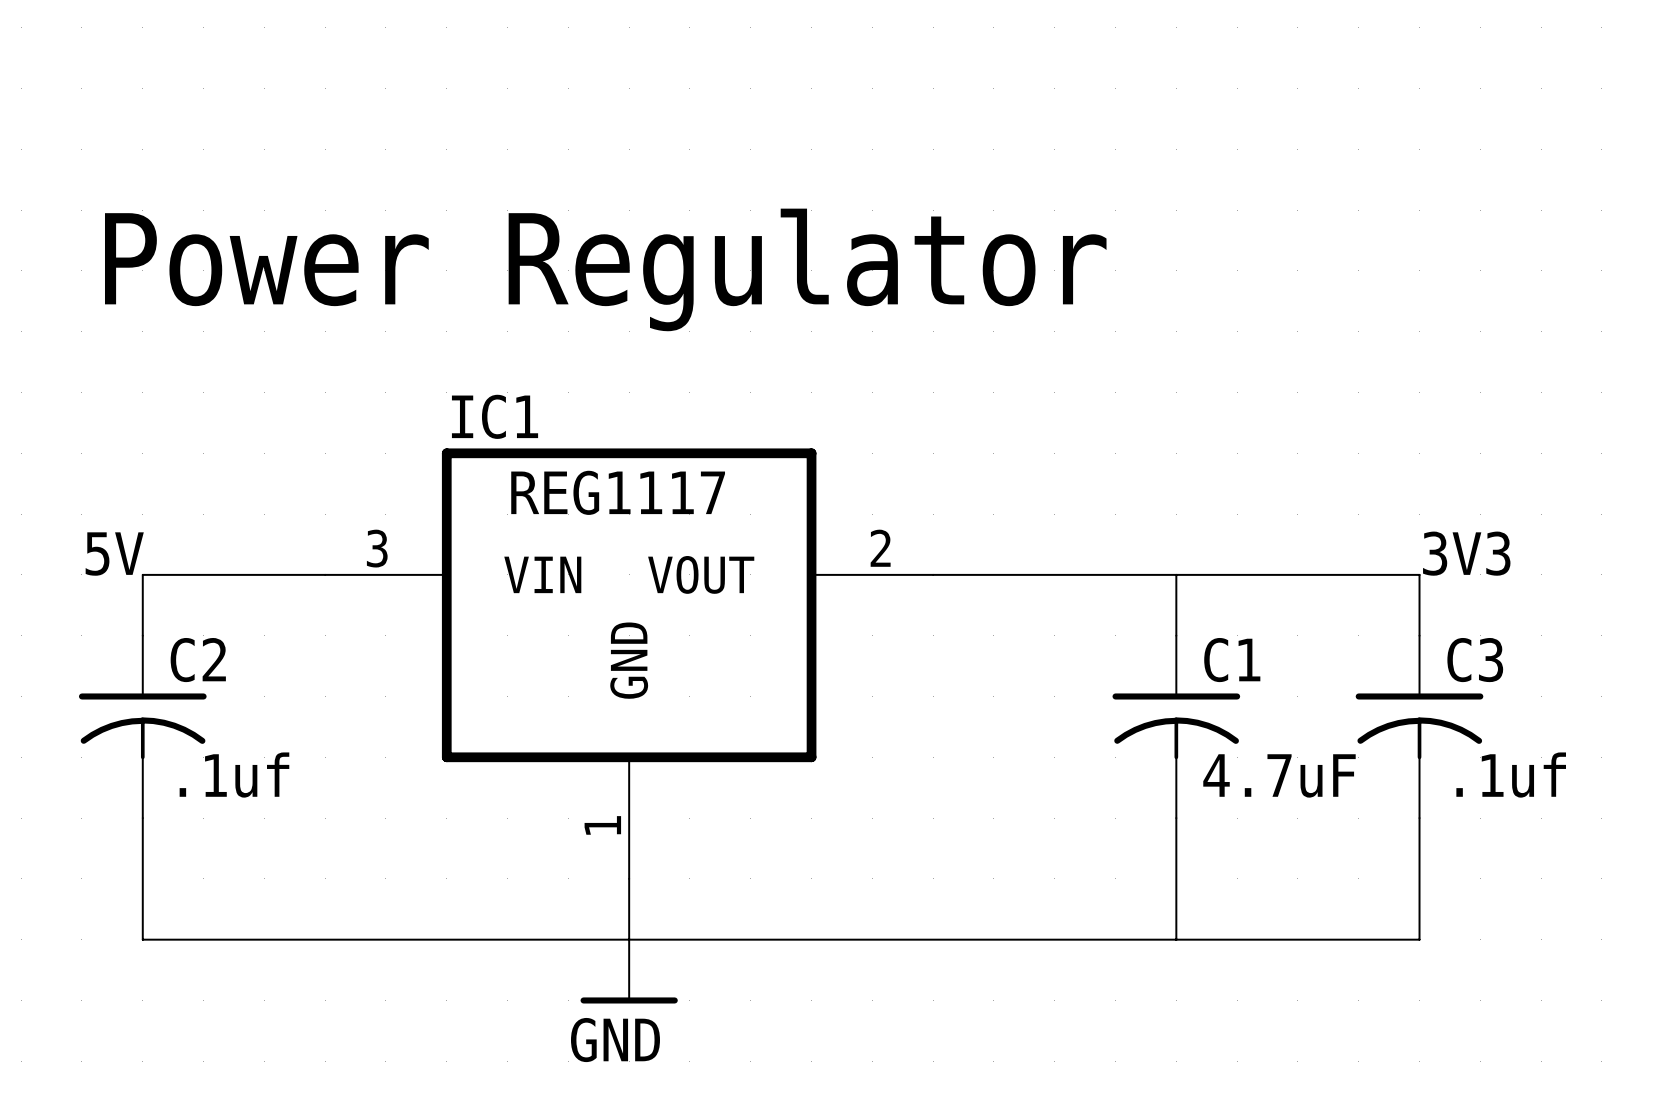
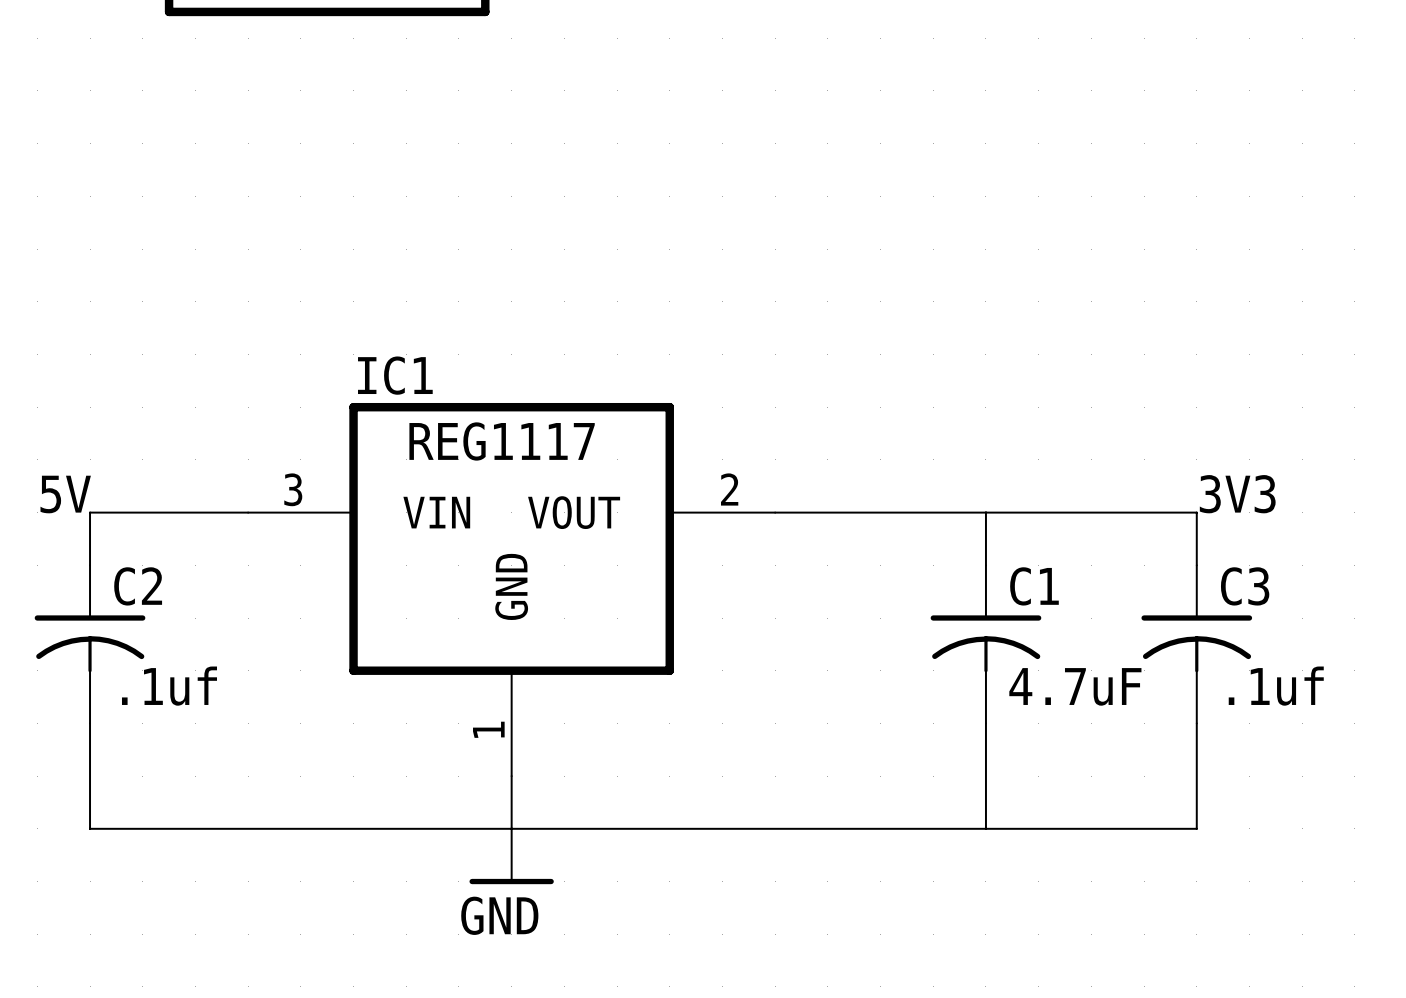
text: Power Regulator (605, 269) -> none

